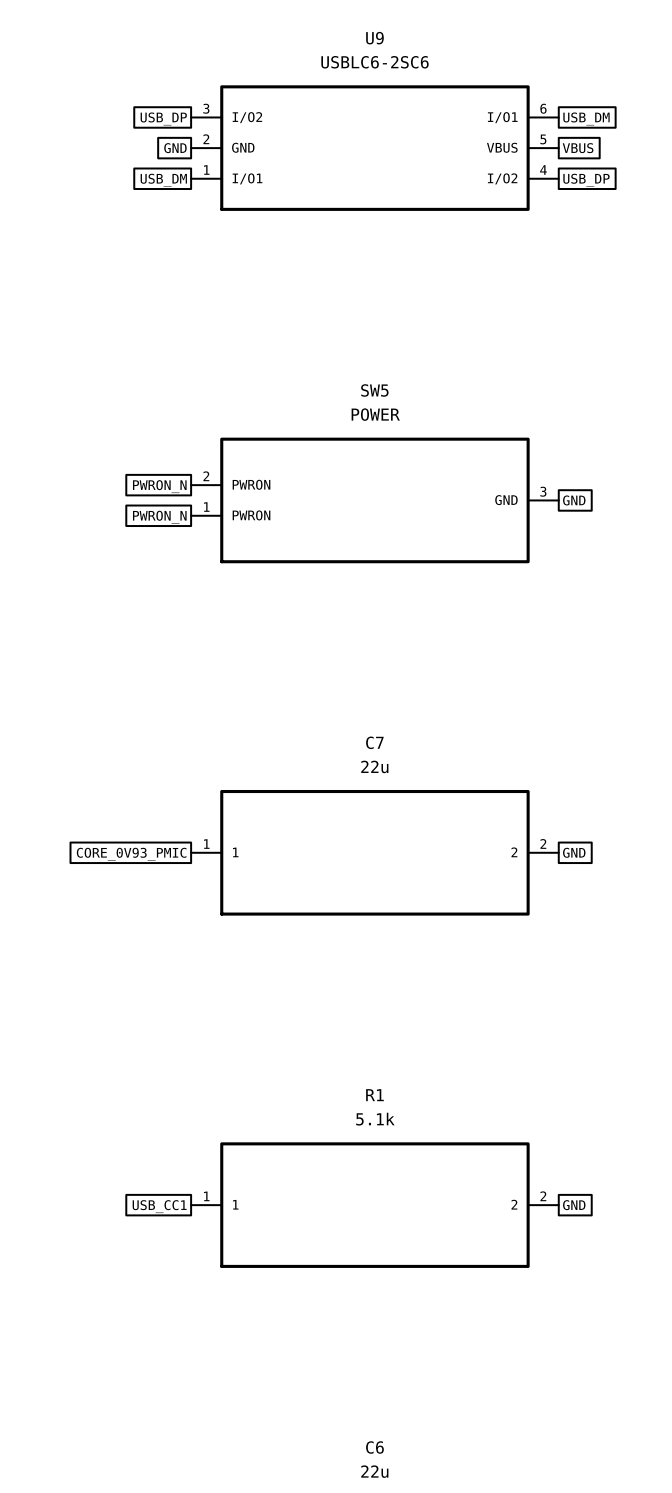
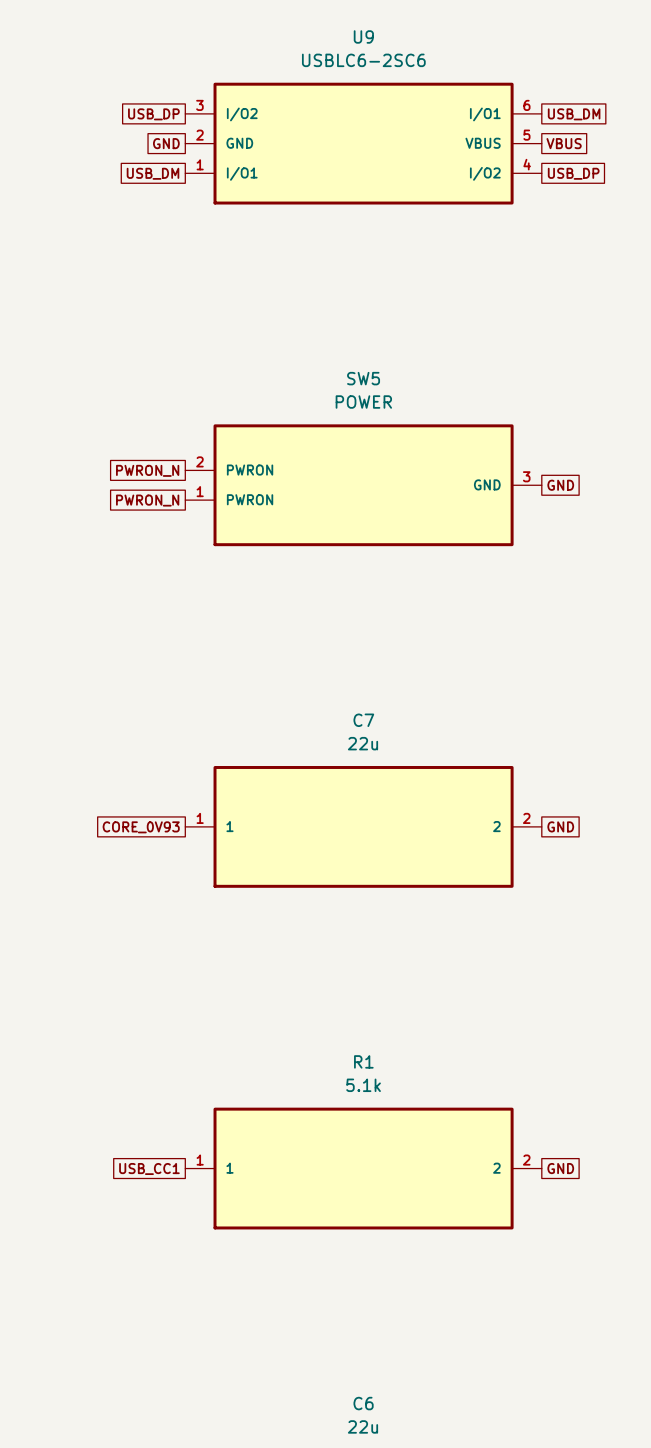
global label: CORE_0V93_PMIC (131, 854) -> CORE_0V93 (141, 827)

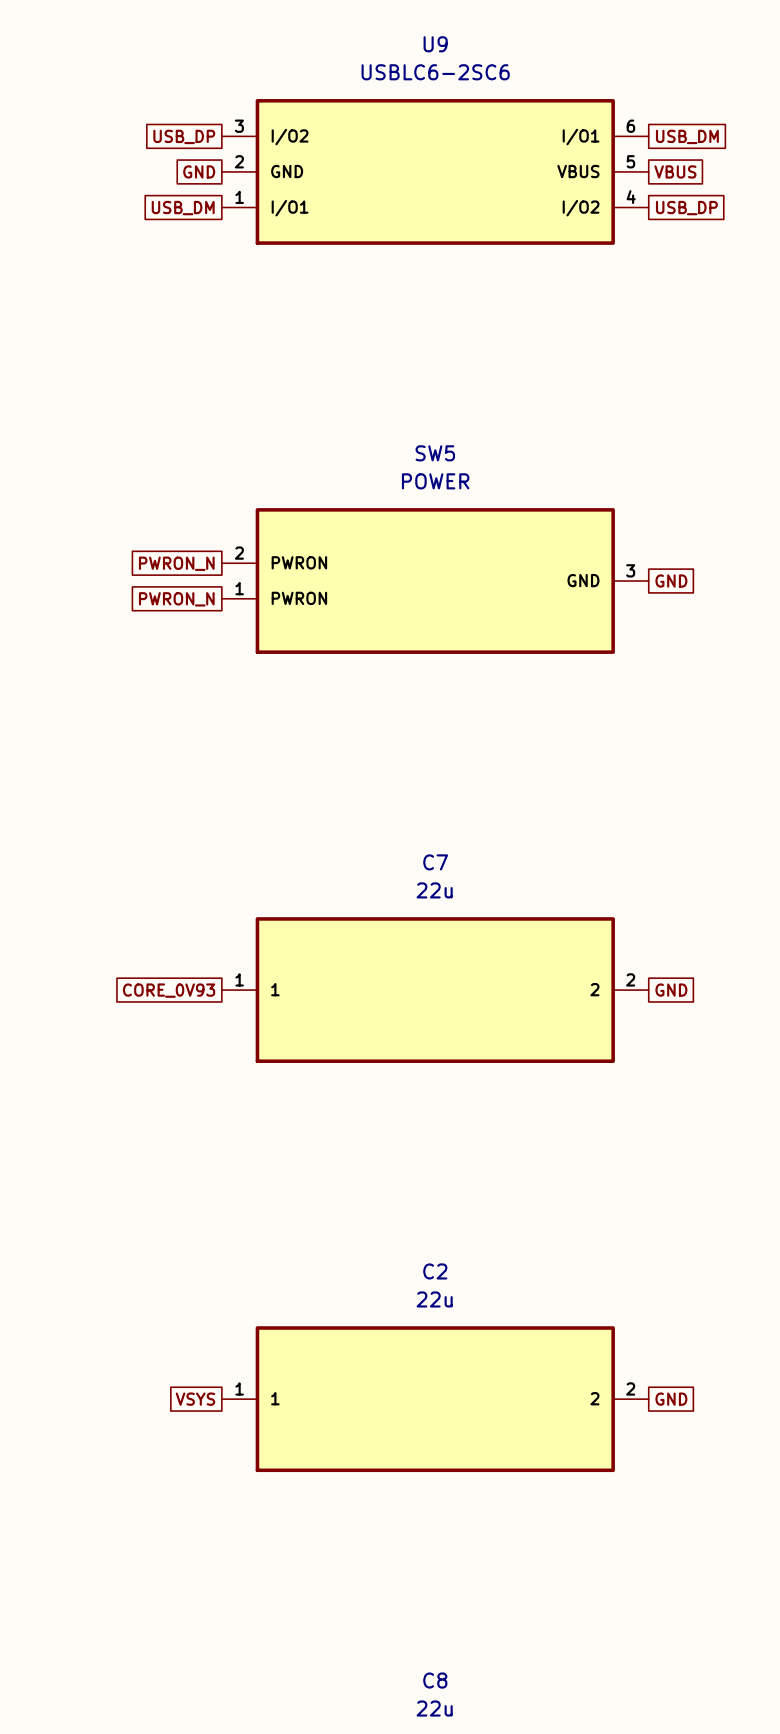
R1 name: R1 (363, 1061) -> C2 (435, 1271)
R1 value: 5.1k (363, 1085) -> 22u (434, 1299)
global label: USB_CC1 (149, 1168) -> VSYS (195, 1399)
C6 name: C6 (363, 1403) -> C8 (435, 1680)

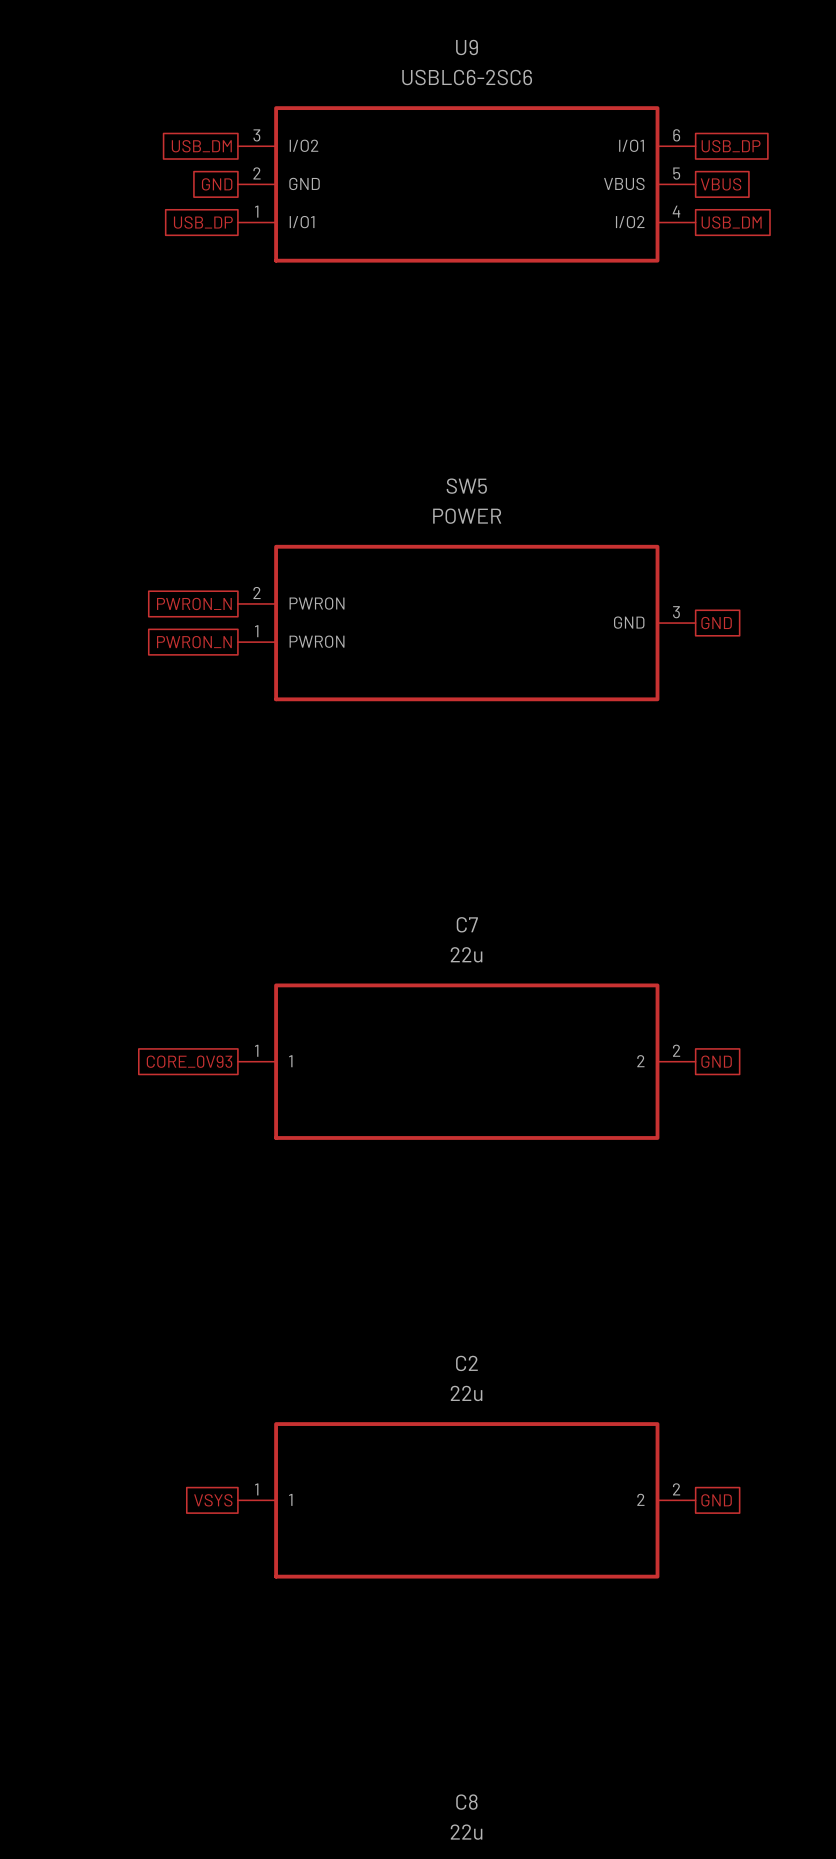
global label: USB_DP (184, 136) -> USB_DM (201, 146)
global label: USB_DM (687, 136) -> USB_DP (731, 146)
global label: USB_DM (183, 208) -> USB_DP (203, 222)
global label: USB_DP (686, 208) -> USB_DM (731, 222)

